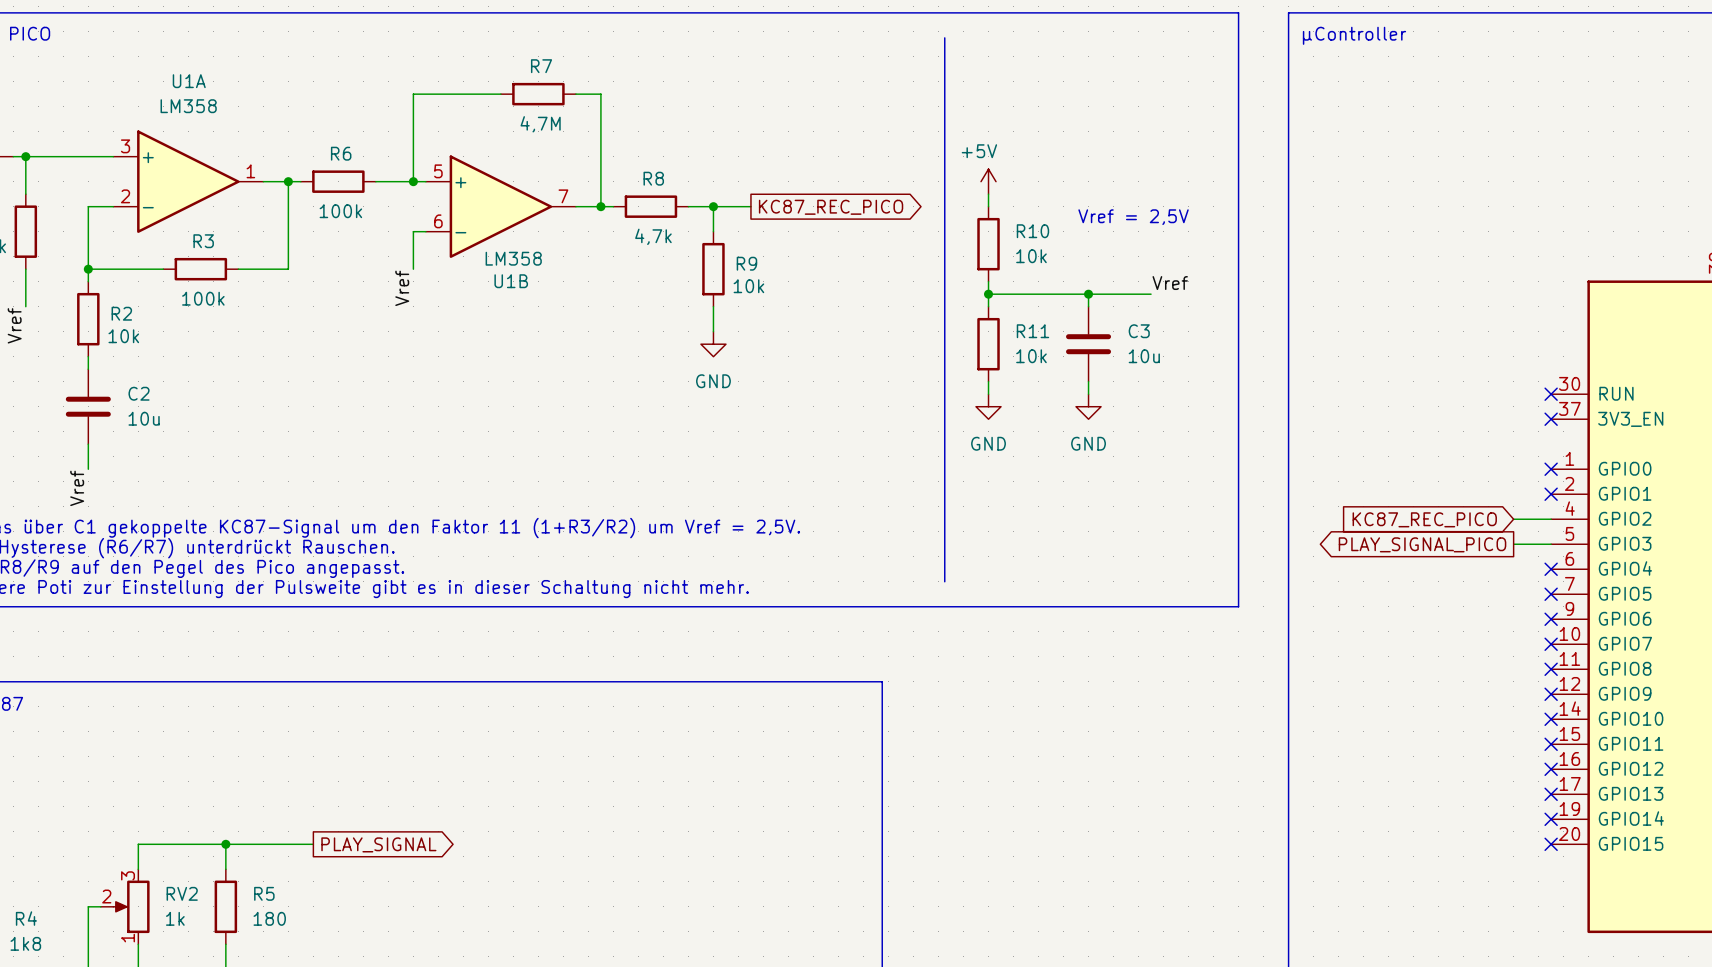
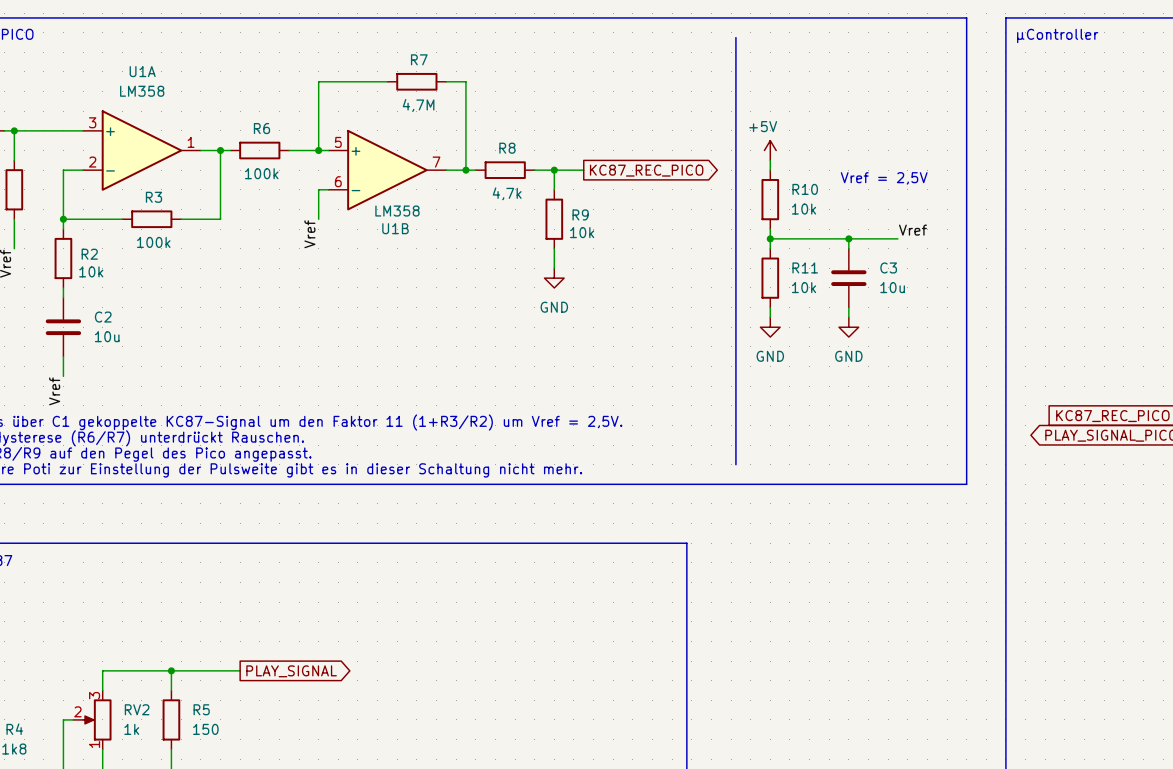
R5 value: 180 (269, 918) -> 150 (205, 729)

